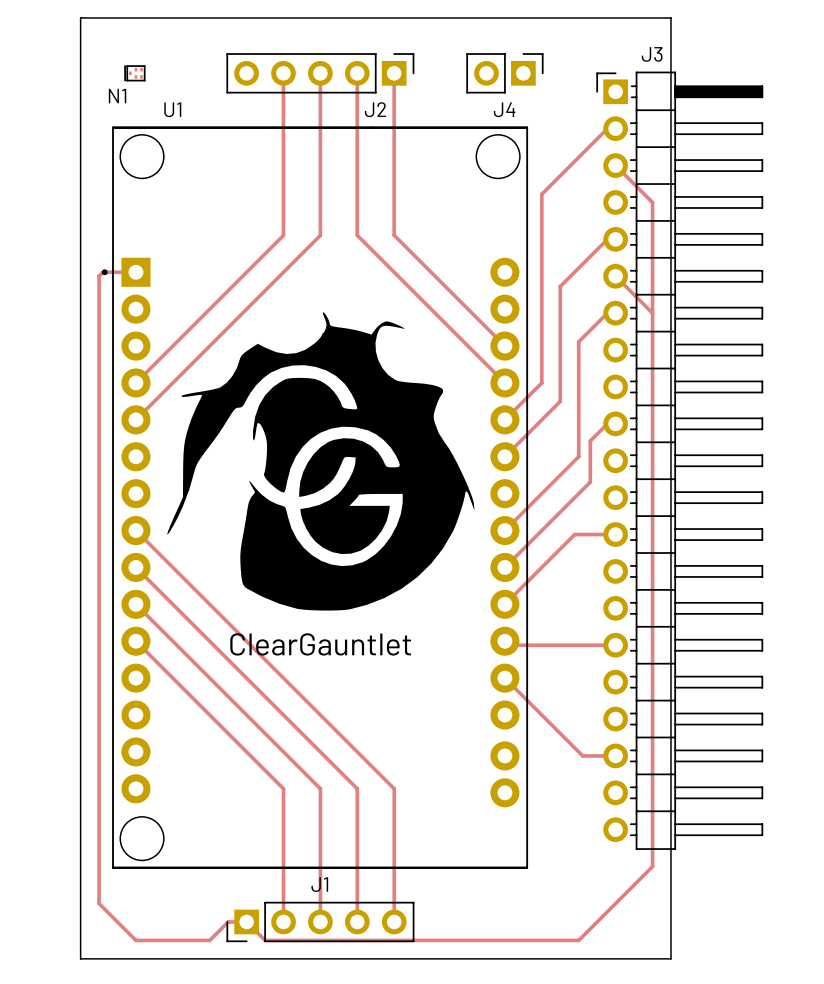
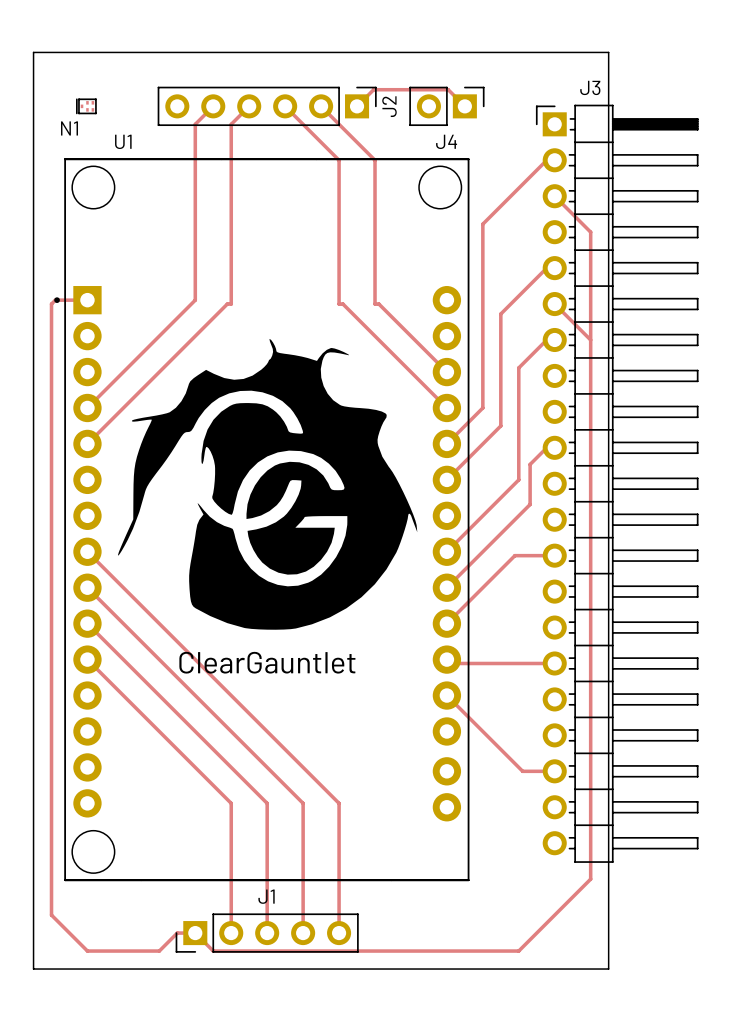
J2 footprint: [226, 53, 415, 94] -> [157, 86, 377, 127]
track: (283, 73) (283, 235) (246, 272) -> (213, 106) (195, 124) (195, 300)
track: (320, 73) (320, 235) (279, 276) -> (249, 106) (231, 124) (231, 304) (227, 304)
track: (357, 73) (357, 235) (398, 276) -> (285, 106) (339, 160) (339, 304) (342, 304)
track: (394, 73) (394, 235) (435, 276) -> (321, 106) (375, 160) (375, 304) (378, 304)
track: none -> (357, 106) (373, 89) (448, 89) (464, 106)
J2 name position: J2 (375, 109) -> J2 (389, 106)

